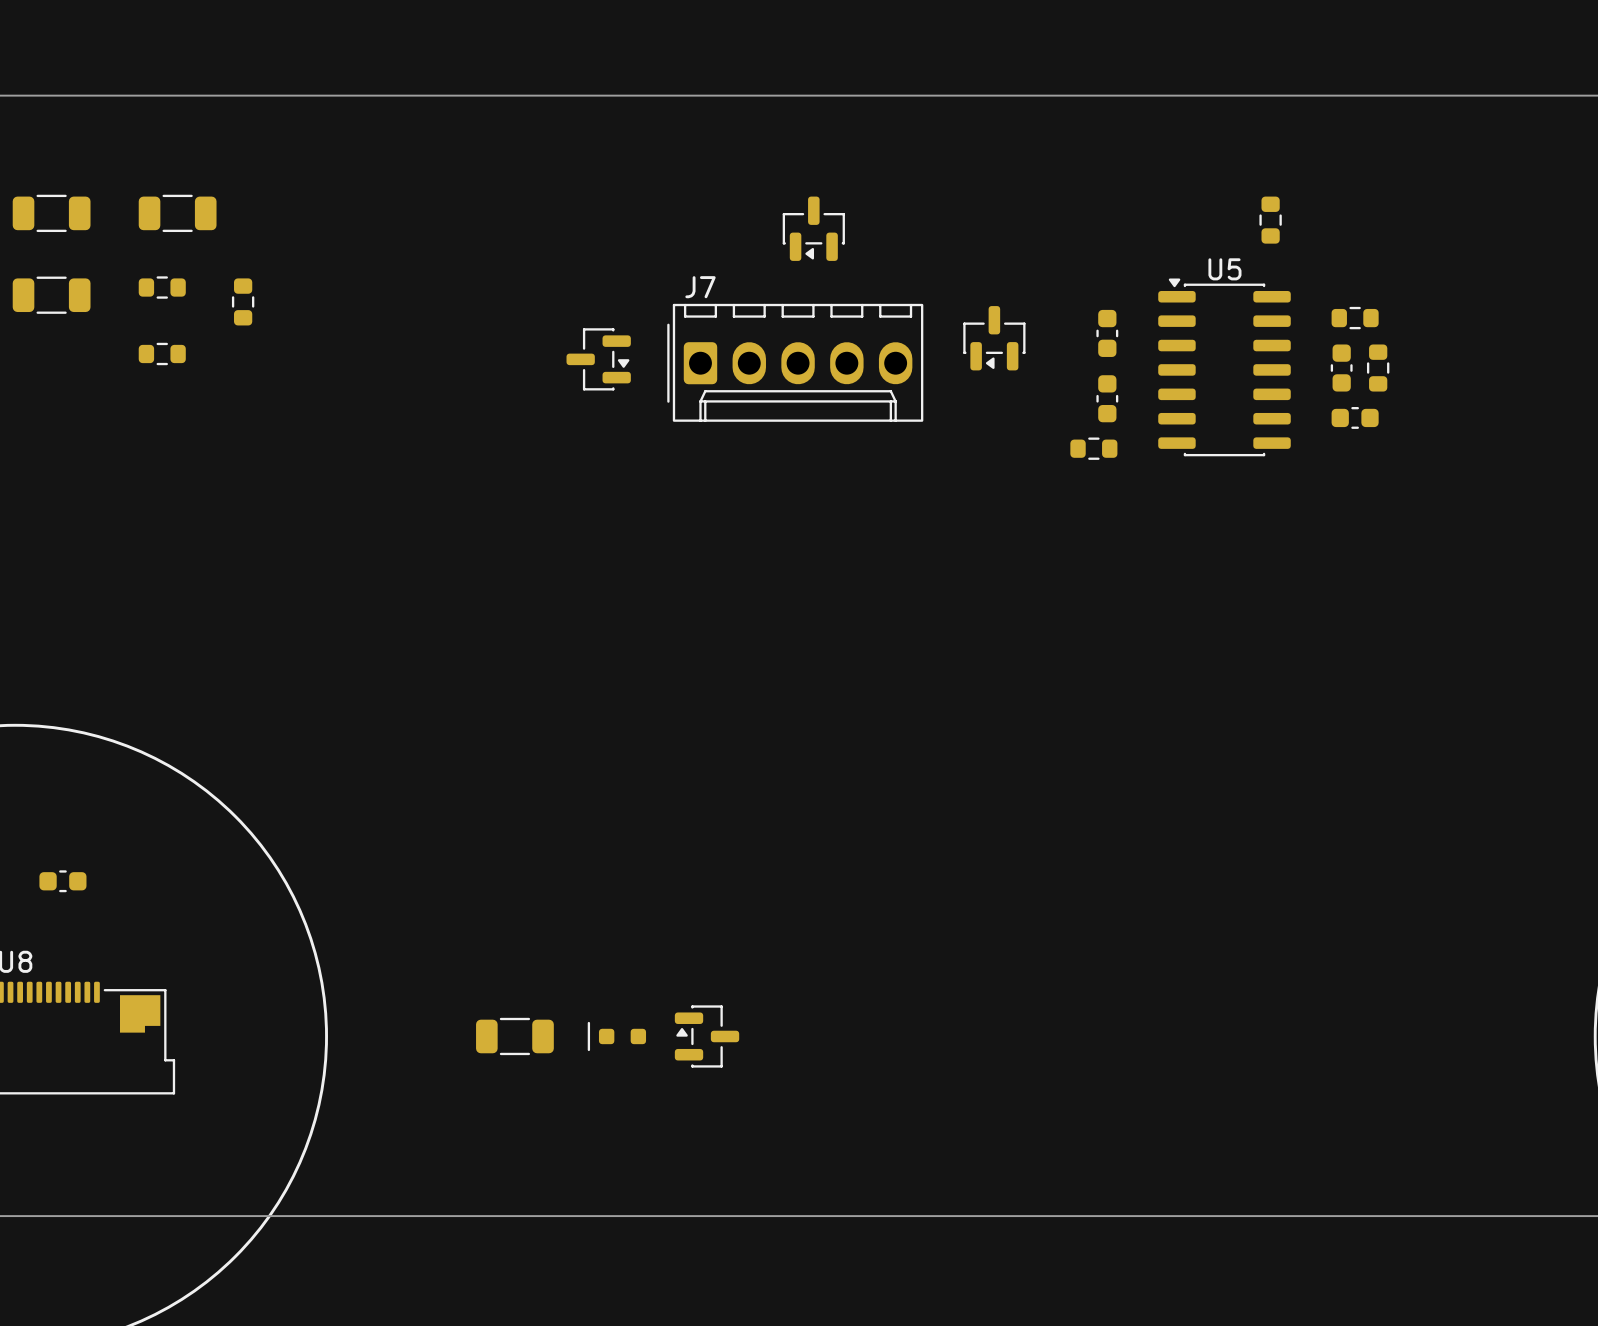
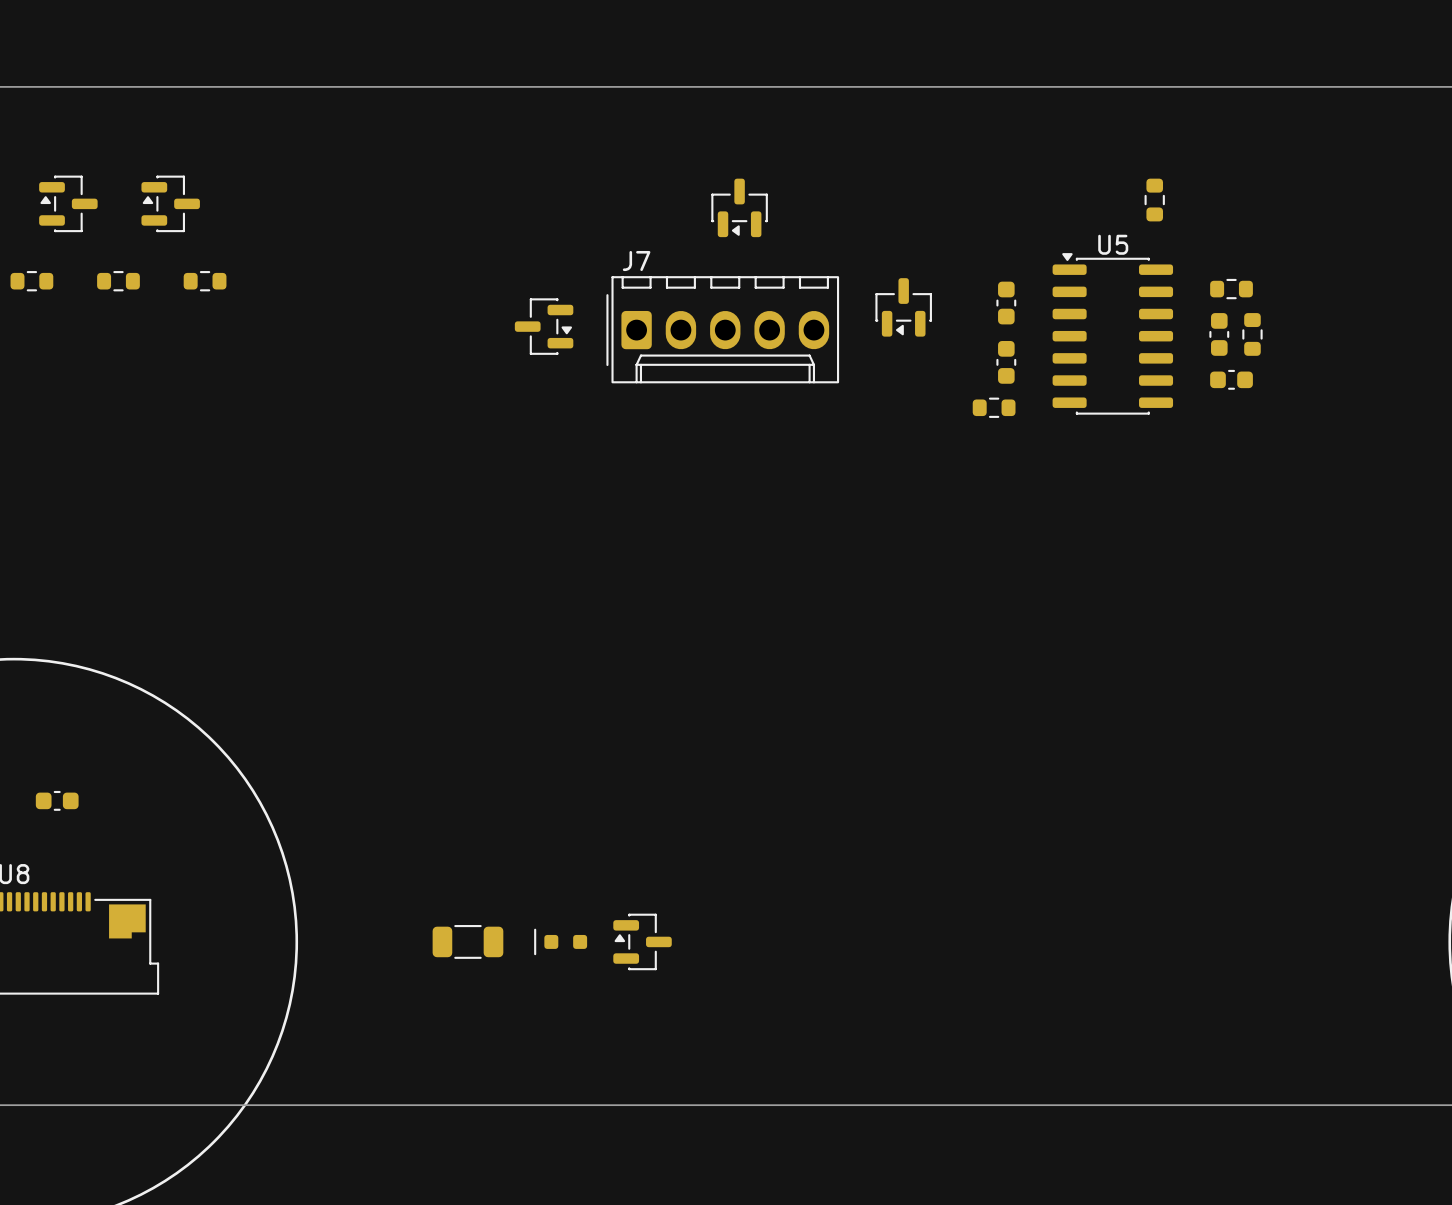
part footprint: [138, 194, 217, 233] -> [141, 175, 200, 233]
part: (51, 213) -> none
part: none -> (68, 203)
part: (162, 287) -> none
part: (51, 295) -> none
part rotation: 0° (243, 301) -> 90° clockwise (205, 281)
part: none -> (31, 281)
part: none -> (118, 281)
part: (162, 353) -> none

